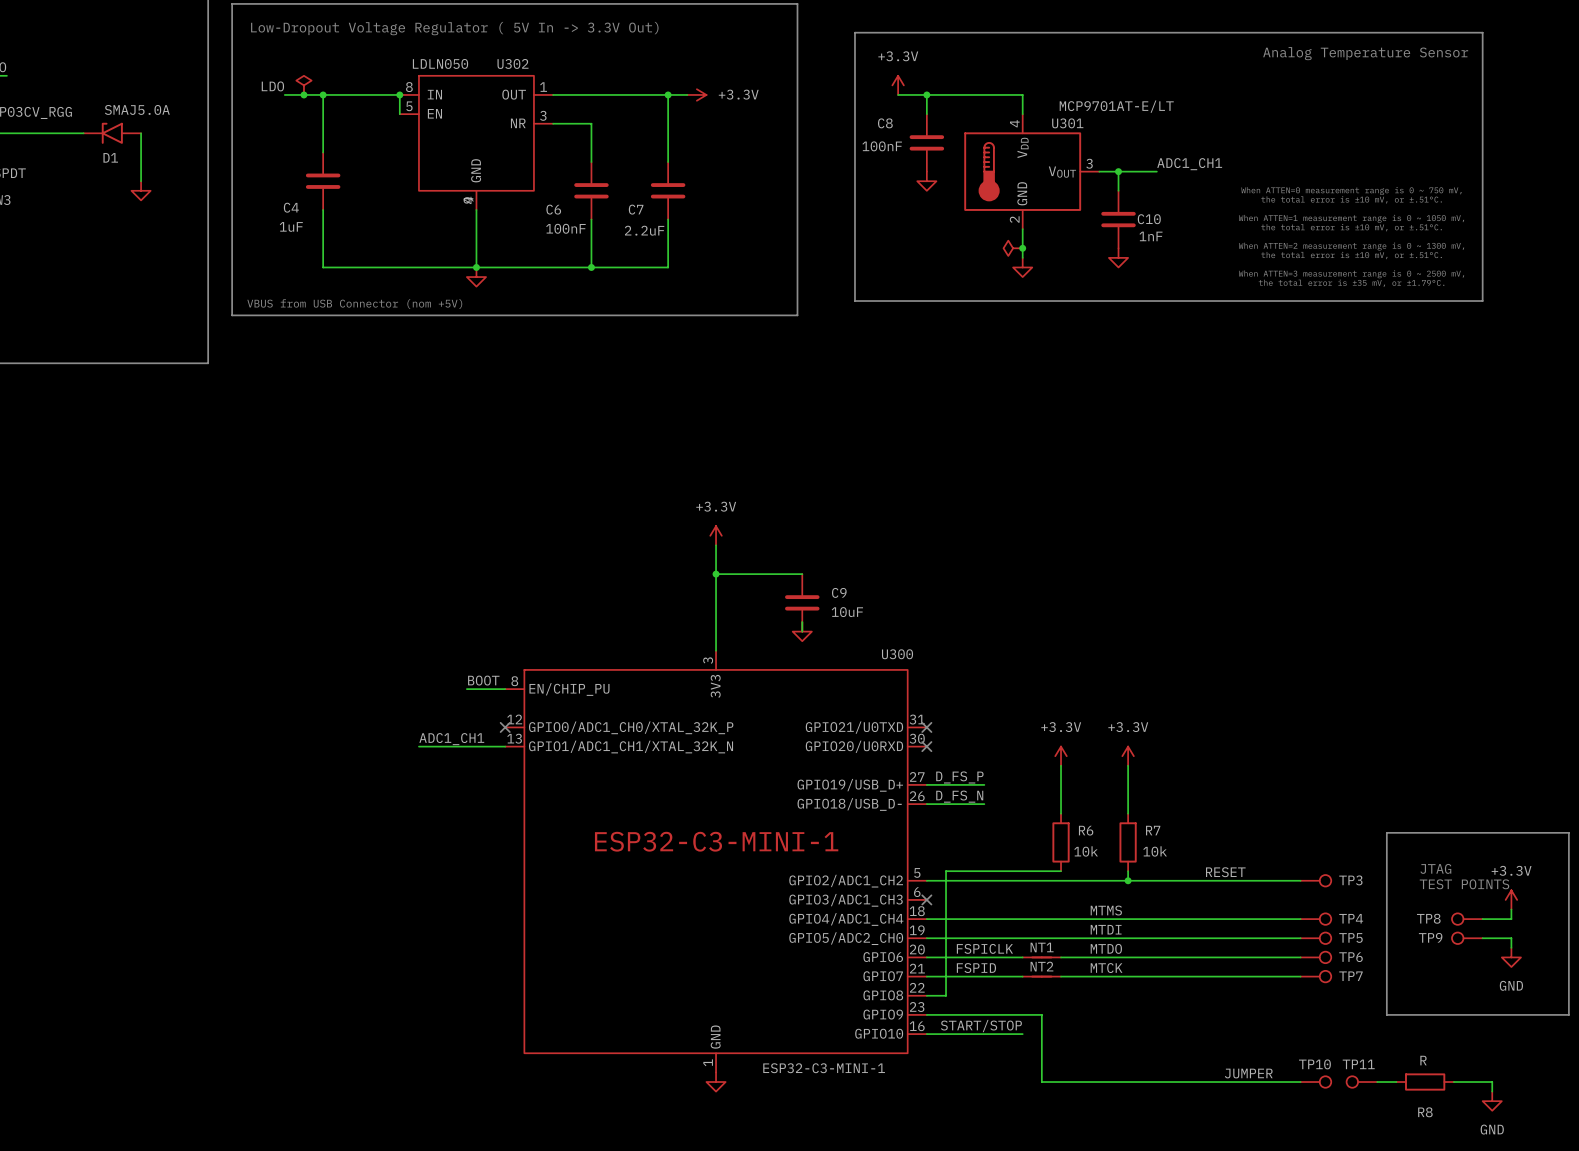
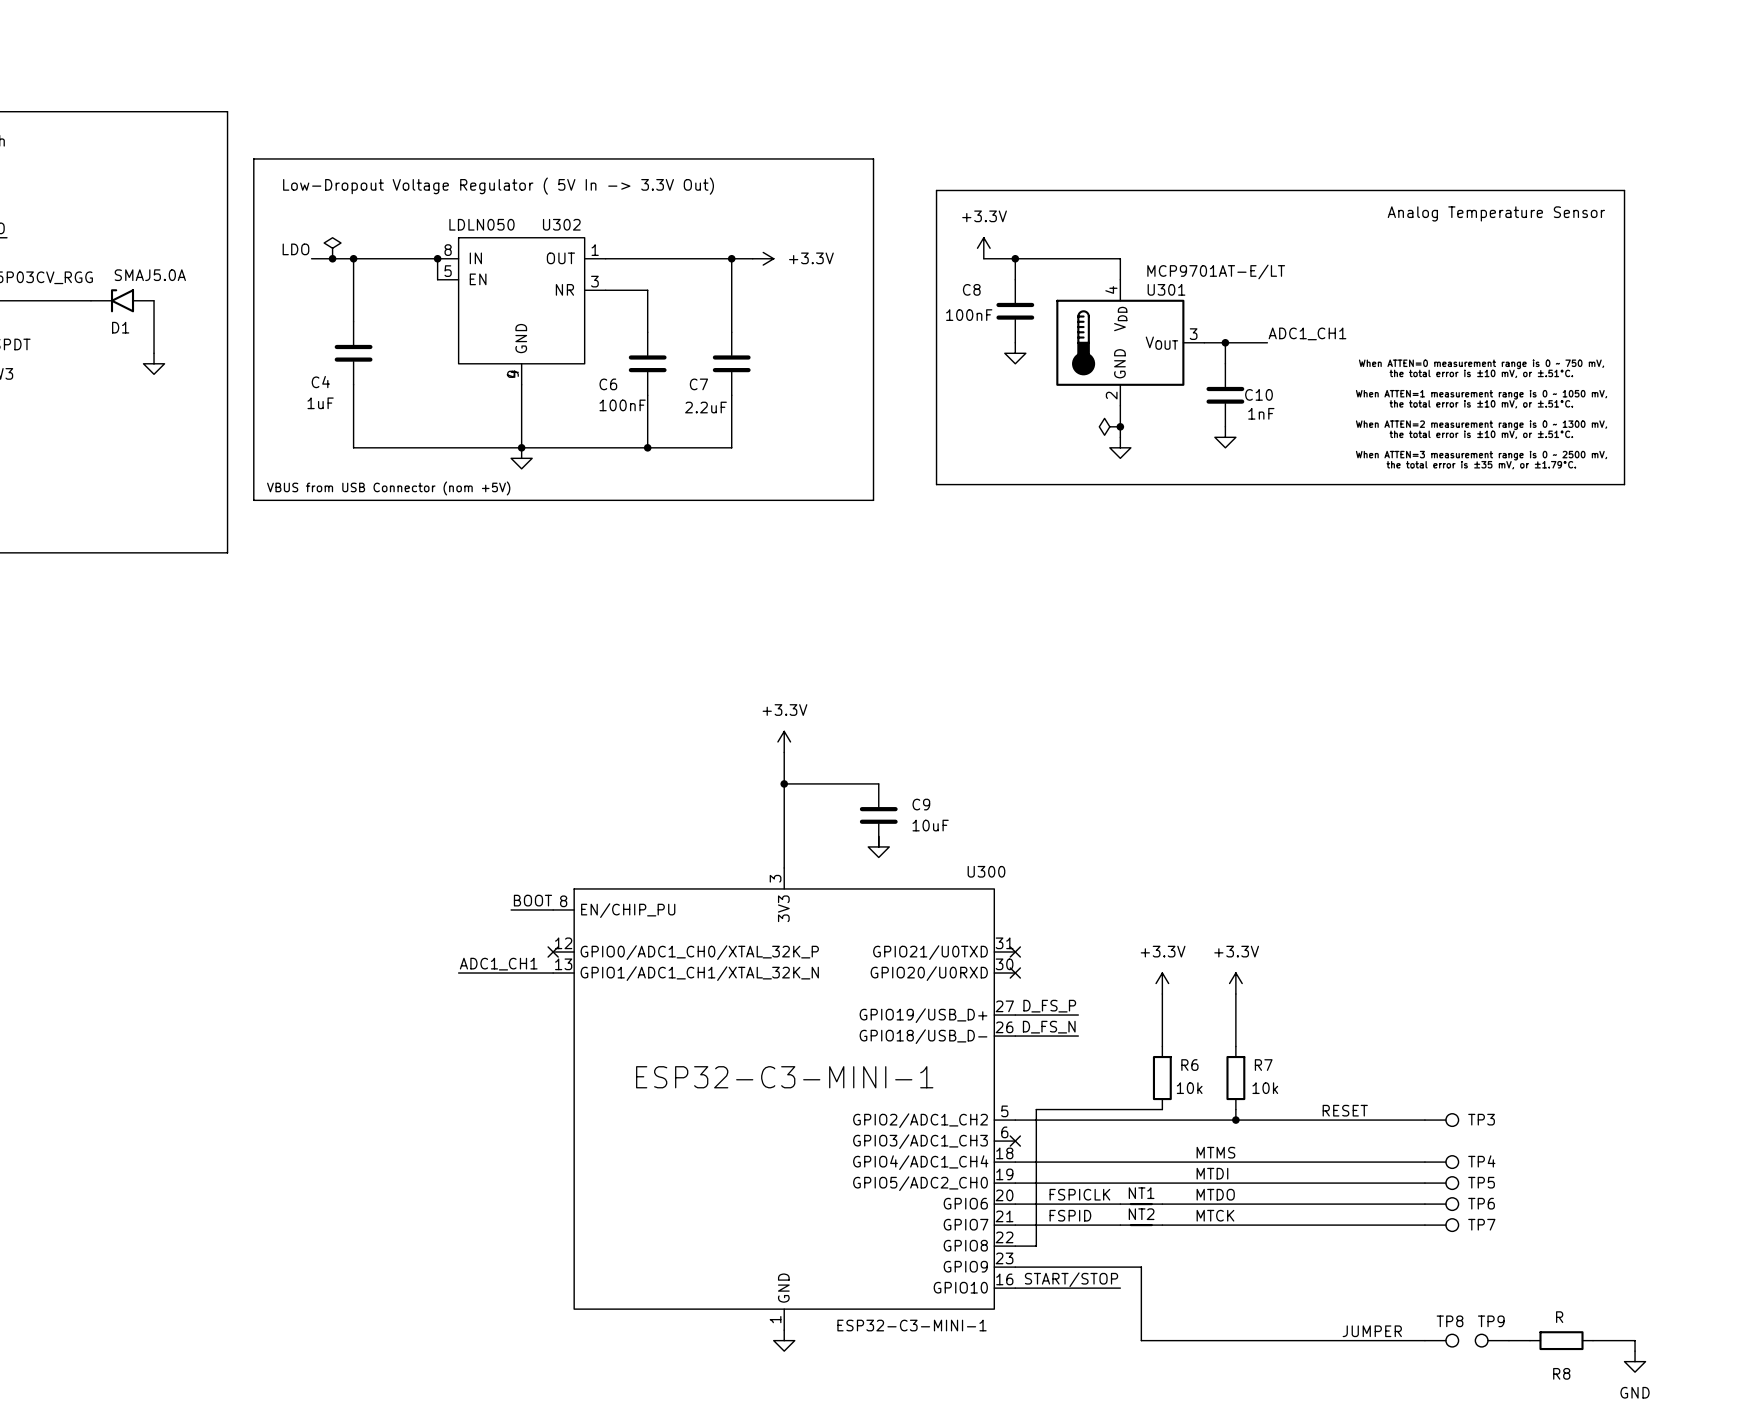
line: (1386, 832) (1568, 832) (1568, 1014) (1386, 1014) (1386, 832) -> none
text: JTAG (1435, 868) -> none
text: TEST POINTS (1464, 884) -> none
power symbol: +3.3V (1511, 899) -> none
wire: (1511, 909) (1511, 919) (1482, 919) -> none
TP8: (1467, 919) -> none
TP9: (1467, 938) -> none
wire: (1482, 938) (1511, 938) (1511, 947) -> none
power symbol: GND (1511, 957) -> none
TP10 name: TP10 (1314, 1064) -> TP8 (1450, 1321)
TP11 name: TP11 (1358, 1064) -> TP9 (1491, 1321)

